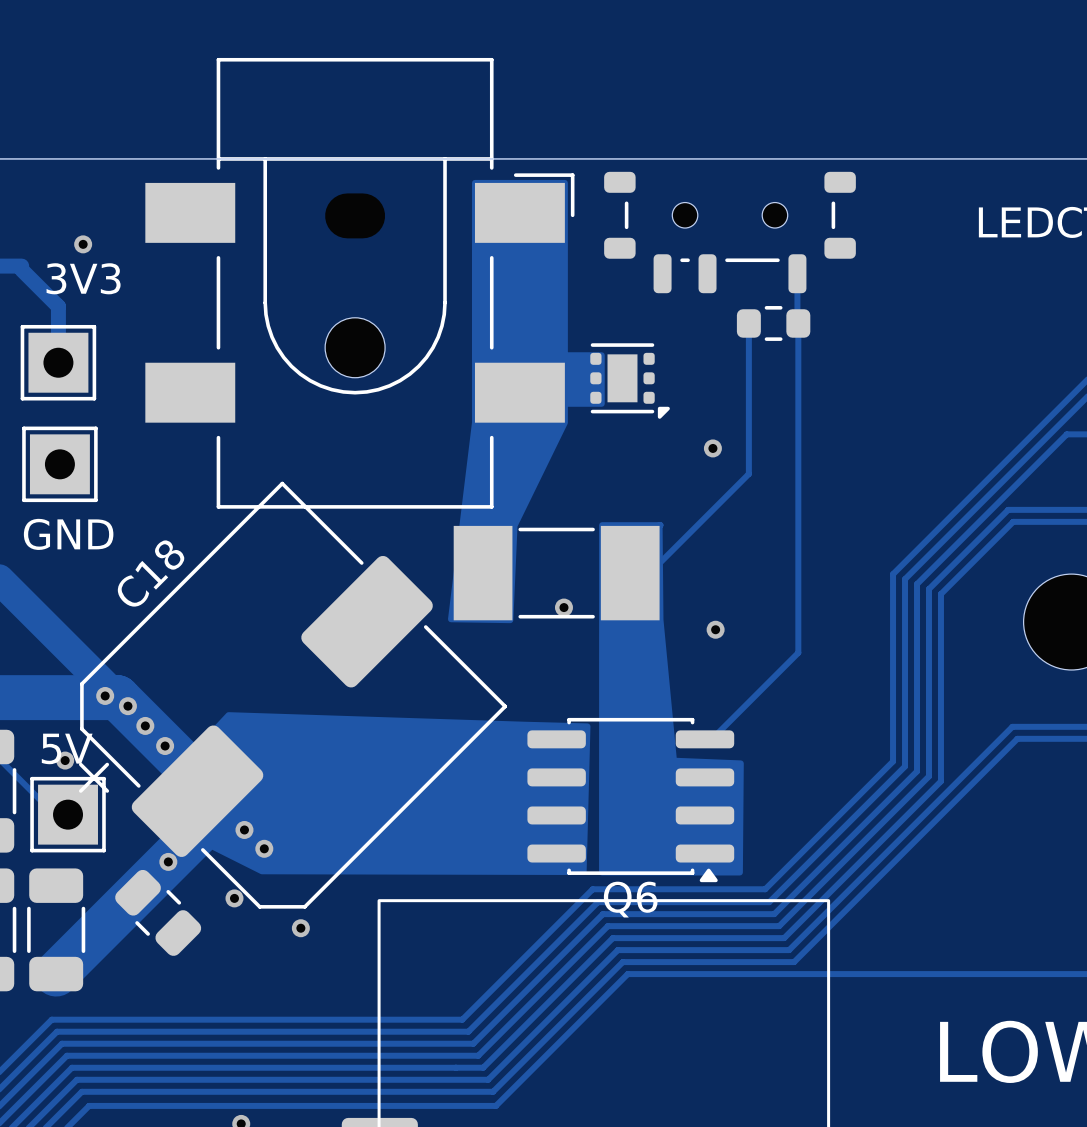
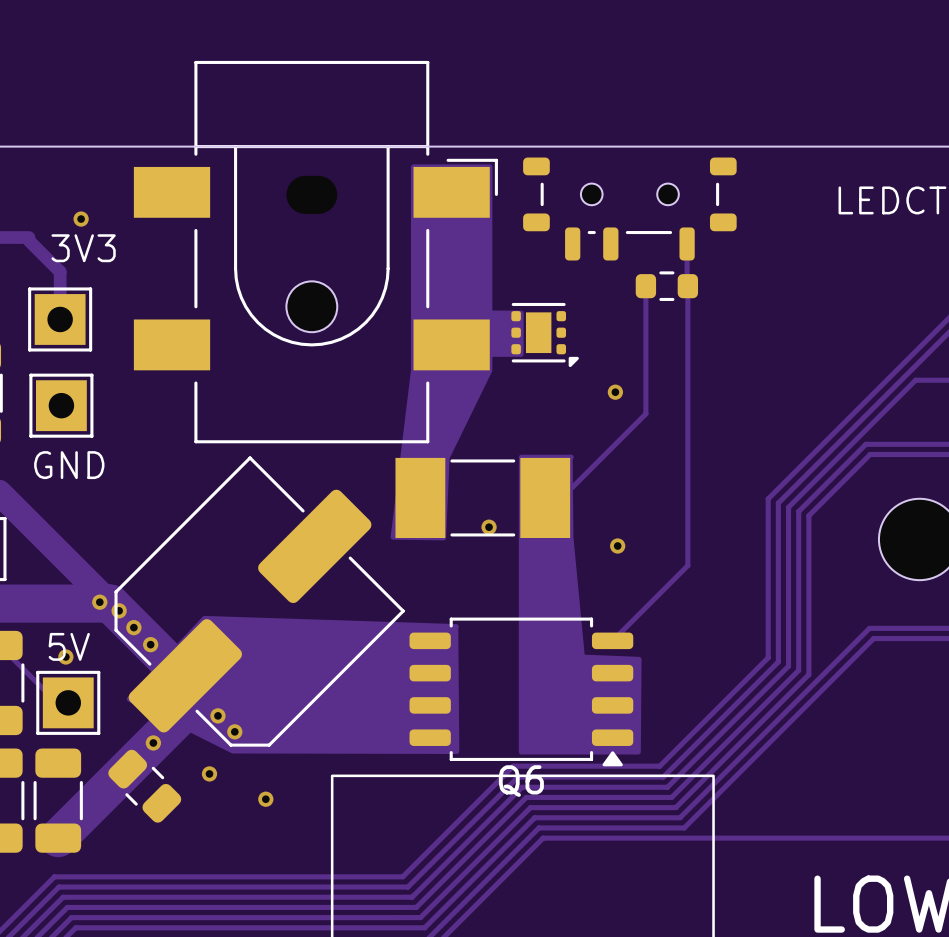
C18: (292, 695) -> none
part: none -> (259, 601)
drawing: [136, 712, 591, 876] -> none
drawing: none -> [126, 615, 460, 754]
Q6 footprint: [527, 717, 735, 883] -> [409, 617, 634, 767]

